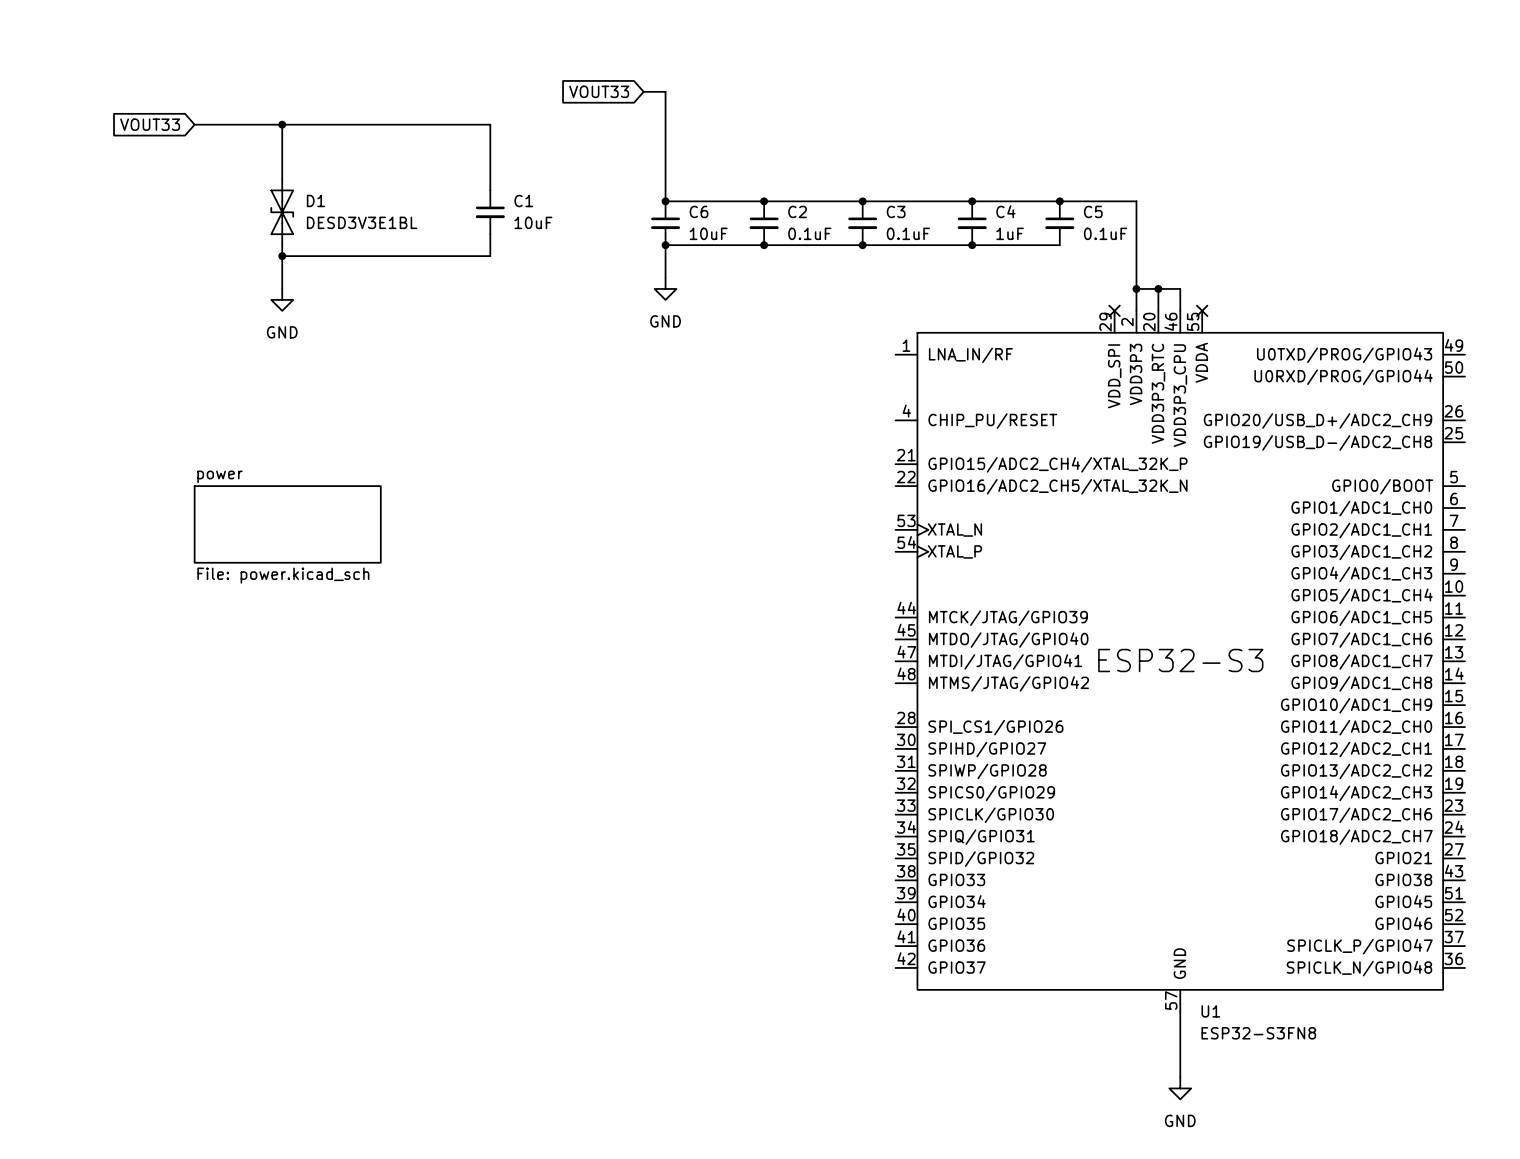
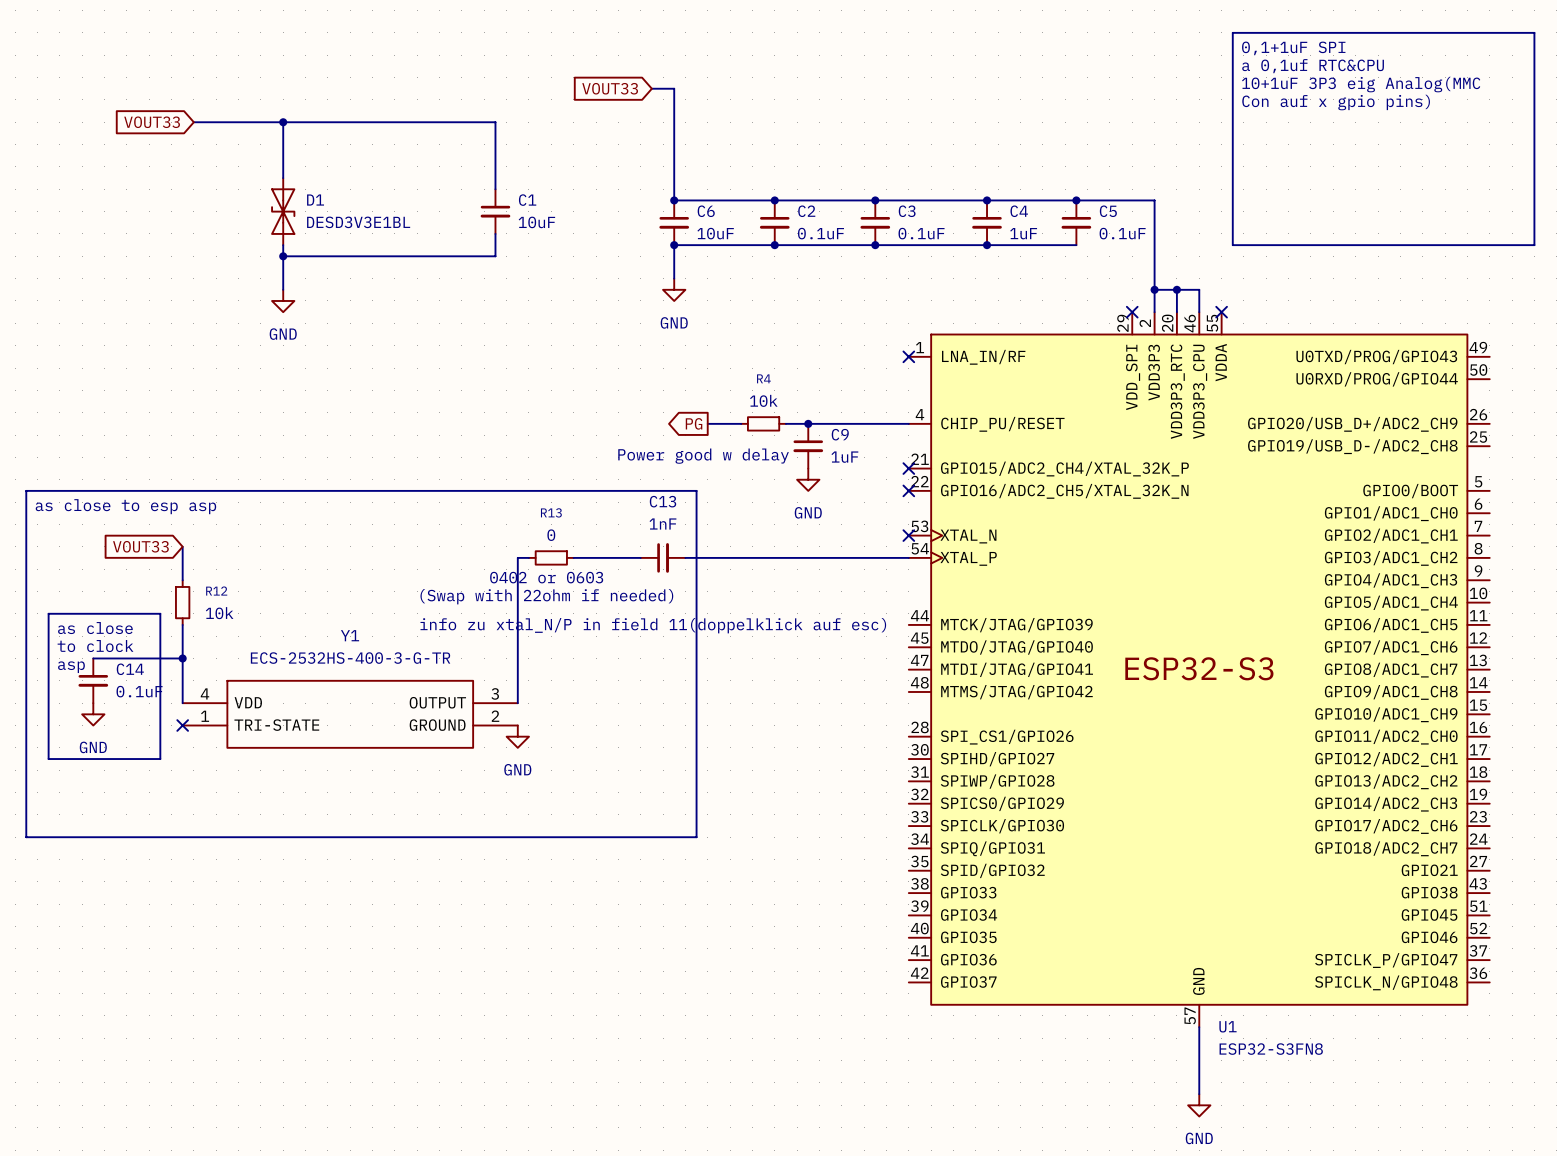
line: none -> (1232, 32) (1534, 32) (1534, 245) (1232, 245) (1232, 32)
text: none -> 0,1+1uF SPI (1293, 48)
text: none -> a 0,1uf RTC&CPU (1313, 66)
text: none -> 10+1uF 3P3 eig Analog(MMC (1361, 84)
text: none -> Con auf x gpio pins) (1336, 102)
no-connect mark: none -> (908, 356)
global label: none -> PG (694, 423)
wire: none -> (707, 423) (741, 423)
R4: none -> 10k (763, 423)
wire: none -> (785, 423) (908, 423)
junction: none -> (808, 423)
C9: none -> 1uF (808, 446)
text: none -> Power good w delay (703, 456)
no-connect mark: none -> (908, 468)
power symbol: none -> GND (808, 479)
line: none -> (26, 490) (696, 490) (696, 837) (26, 837) (26, 490)
no-connect mark: none -> (908, 490)
text: none -> as close to esp asp (125, 506)
sheet power: File: power.kicad_sch (287, 524) -> none
no-connect mark: none -> (908, 535)
global label: none -> VOUT33 (140, 546)
wire: none -> (182, 546) (182, 580)
wire: none -> (528, 557) (517, 557) (517, 703)
R13: none -> 0 (551, 557)
wire: none -> (573, 557) (640, 557)
C13: none -> 1nF (663, 557)
wire: none -> (685, 557) (908, 557)
text: none -> 0402 or 0603 (546, 577)
text: none -> (Swap with 22ohm if needed) (546, 596)
R12: none -> 10k (182, 602)
line: none -> (48, 613) (160, 613) (160, 759) (48, 759) (48, 613)
wire: none -> (182, 624) (182, 703)
text: none -> info zu xtal_N/P in field 11(doppelklick auf esc) (653, 625)
text: none -> as close (95, 628)
text: none -> to clock (95, 646)
wire: none -> (93, 658) (182, 658)
junction: none -> (182, 658)
text: none -> asp (71, 667)
C14: none -> 0.1uF (93, 680)
power symbol: none -> GND (93, 714)
Y1: none -> ECS-2532HS-400-3-G-TR (350, 714)
no-connect mark: none -> (182, 725)
power symbol: none -> GND (517, 736)

